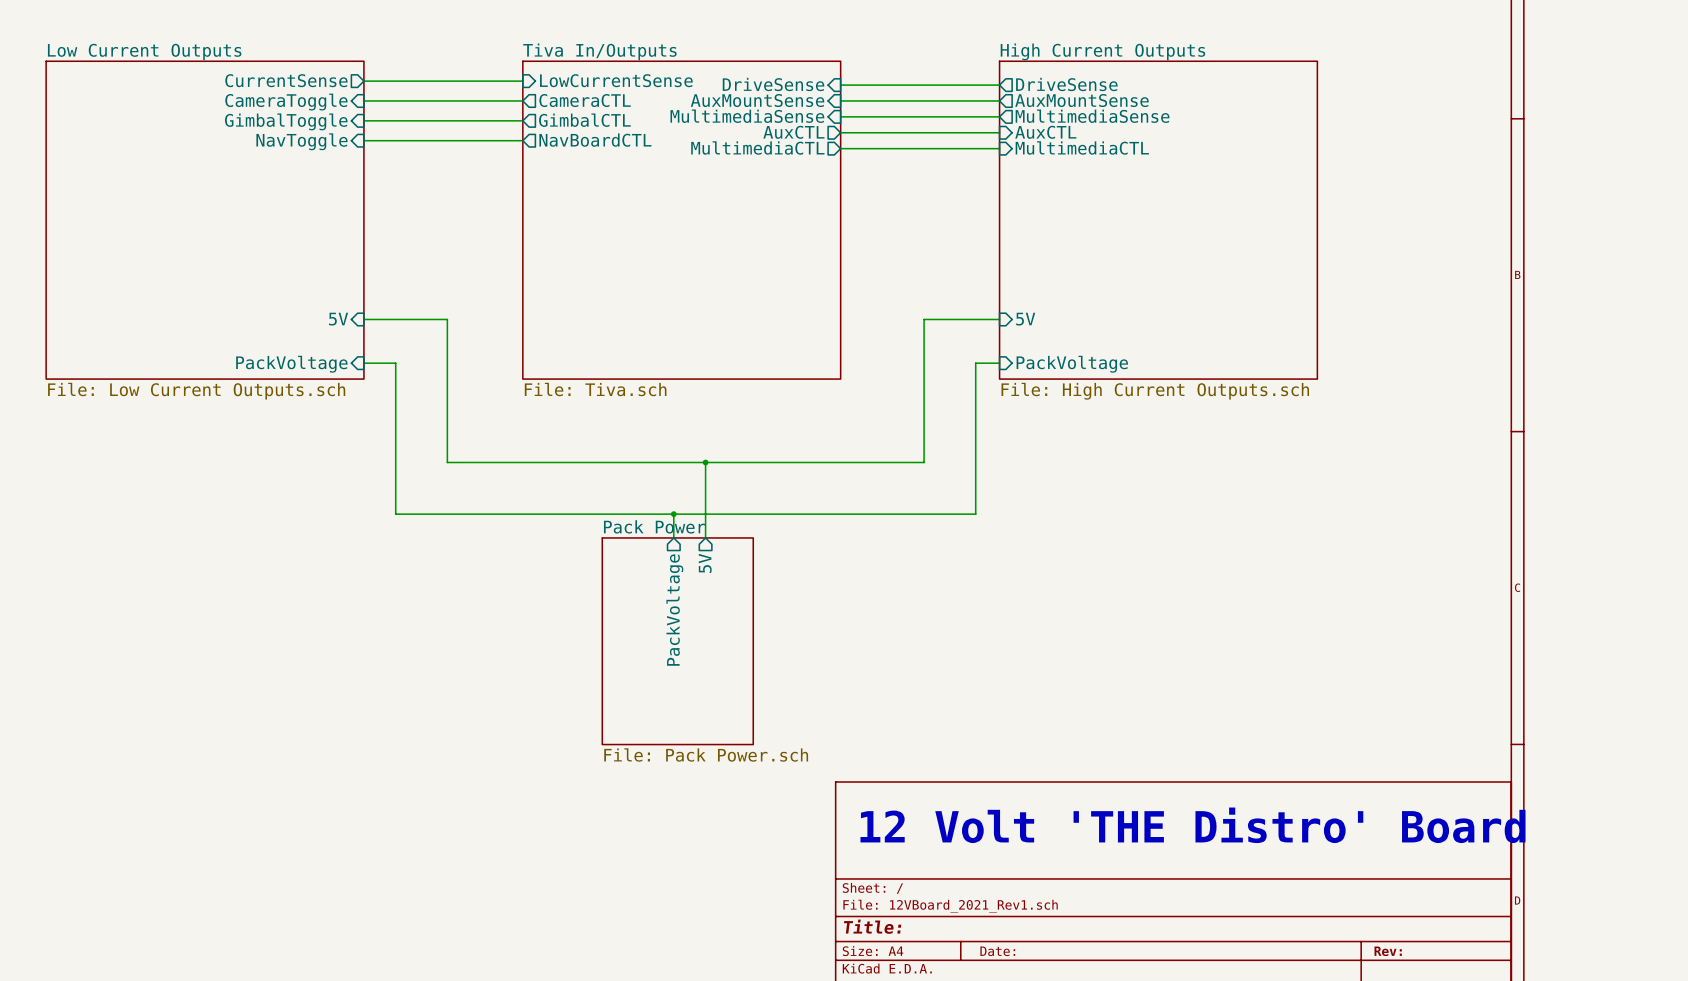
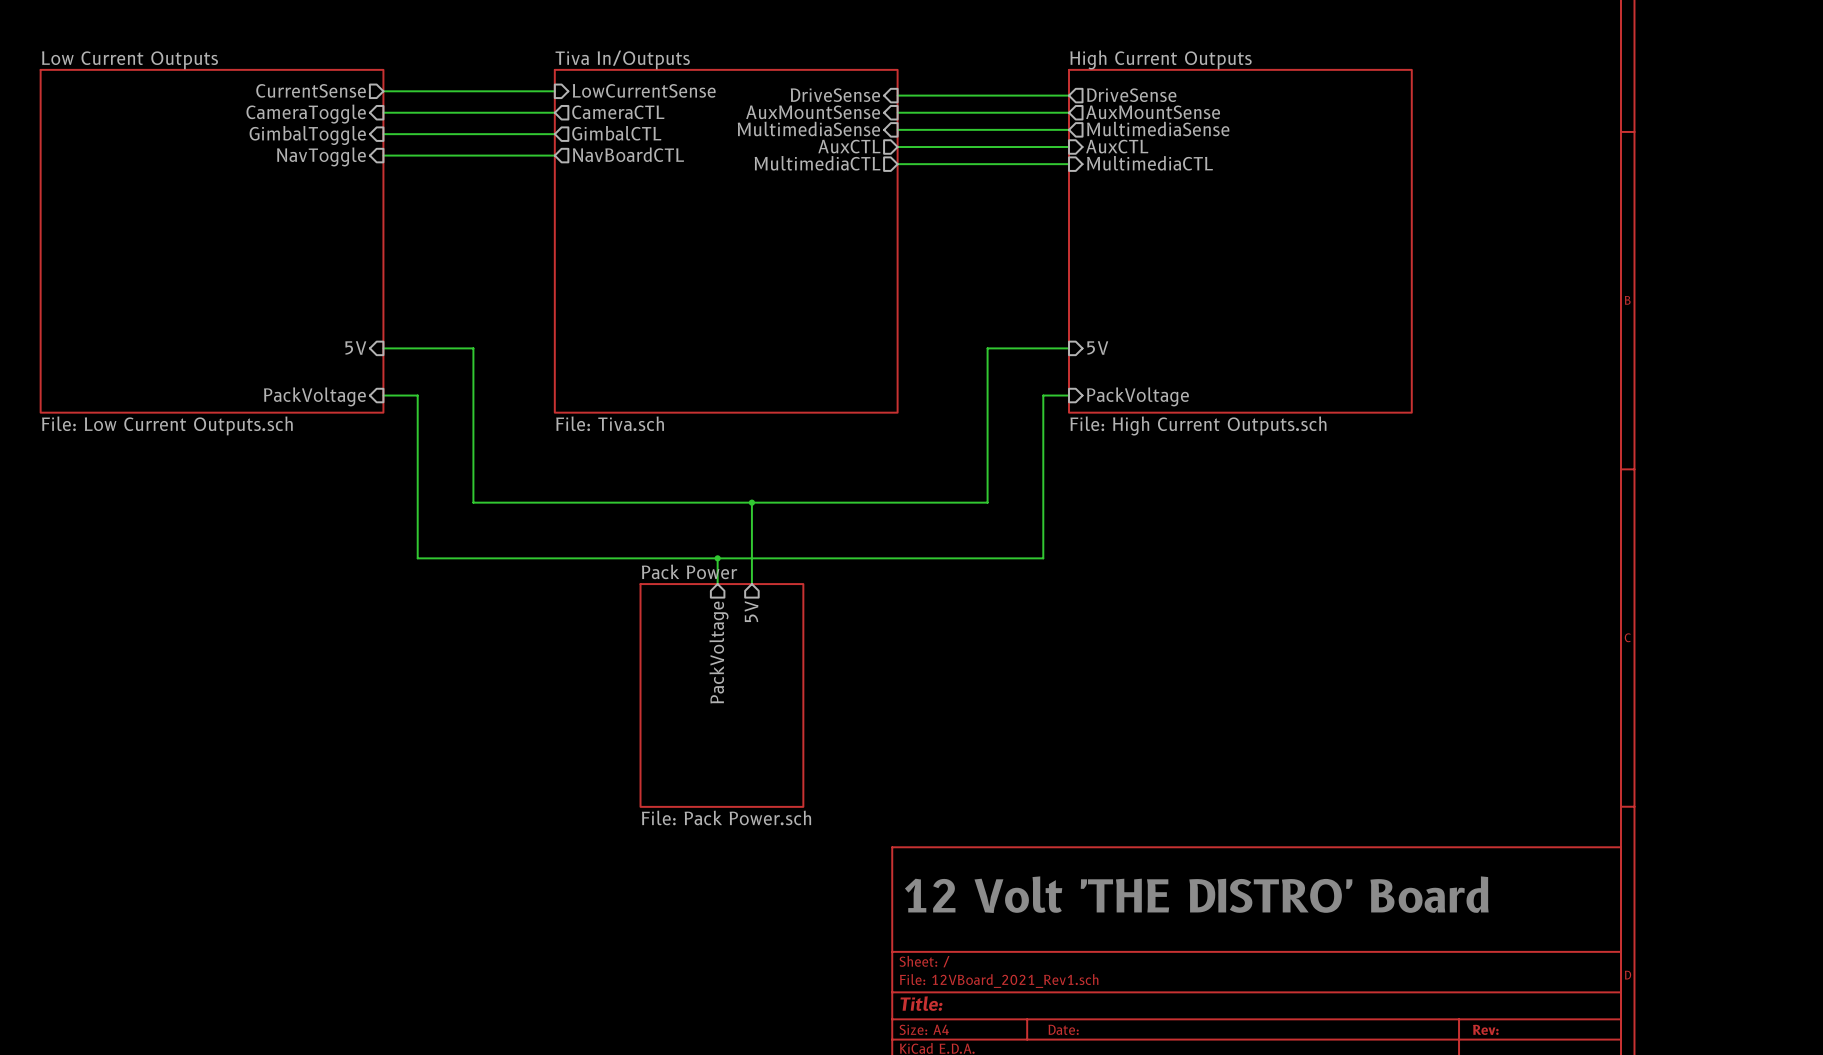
text: 12 Volt 'THE Distro' Board (1193, 825) -> 12 Volt 'THE DISTRO' Board (1196, 894)

